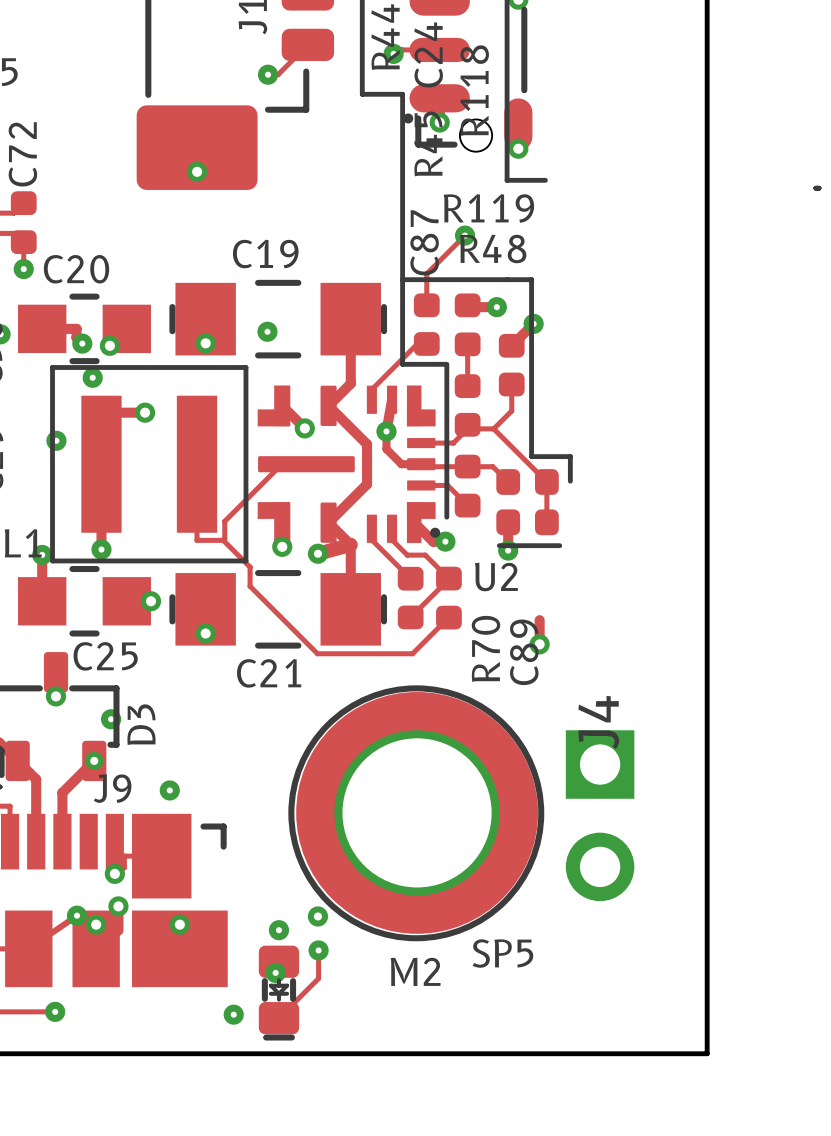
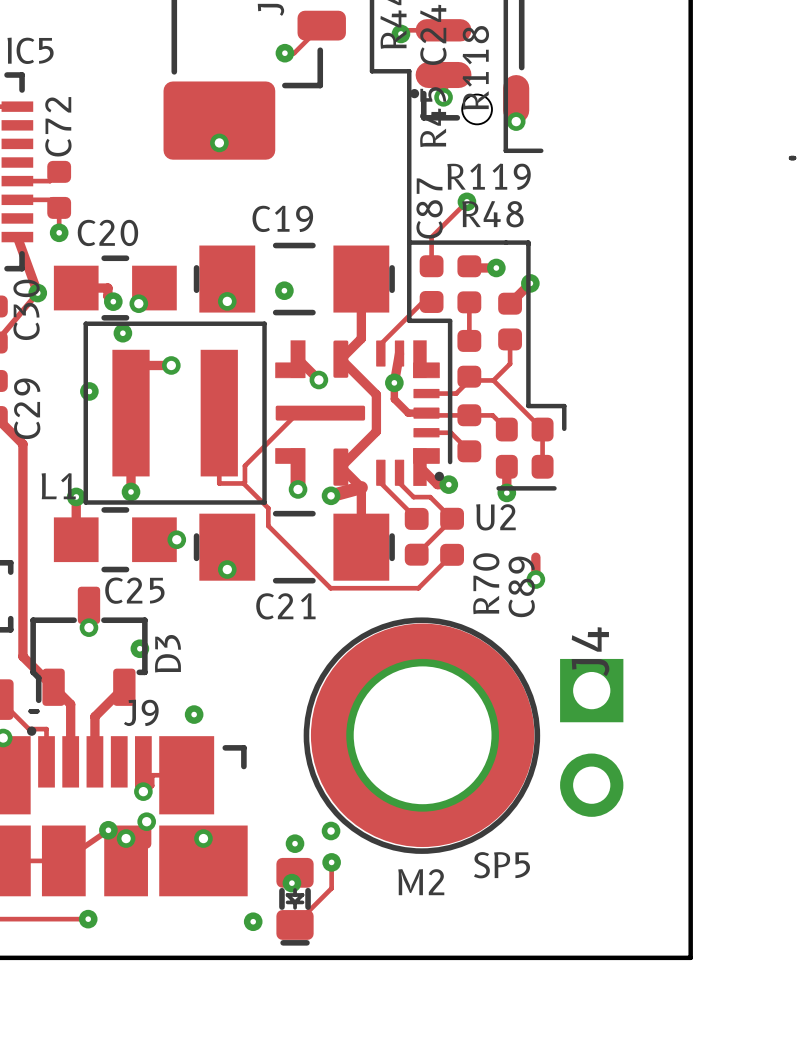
via: (94, 760) -> none

